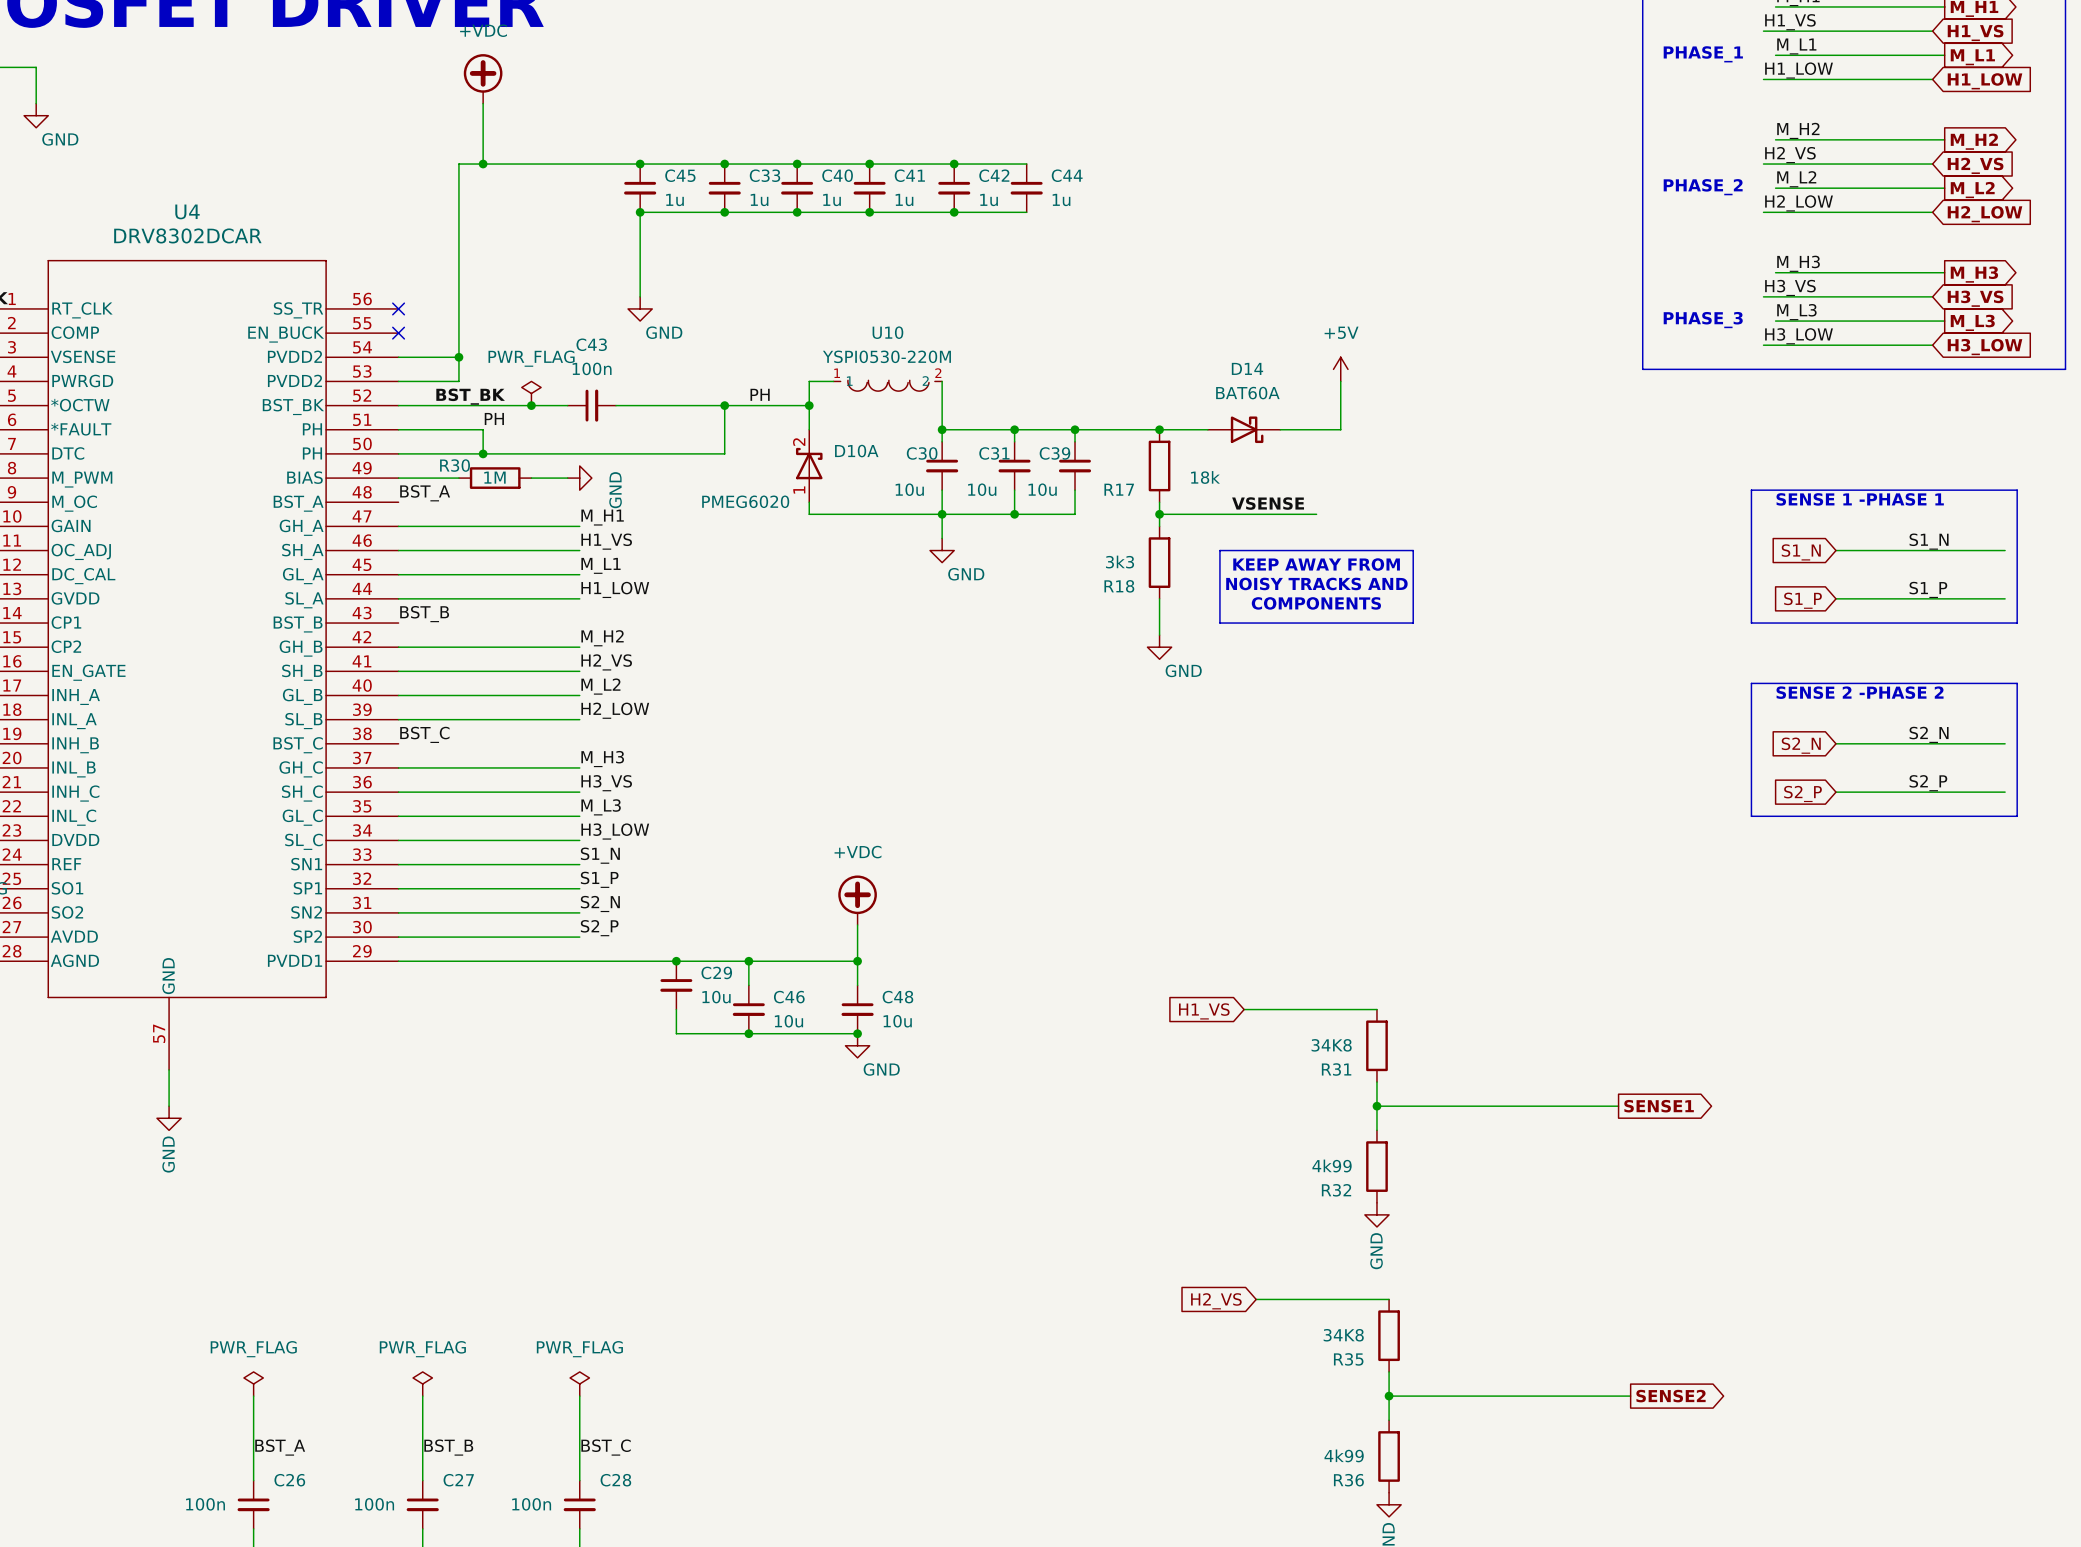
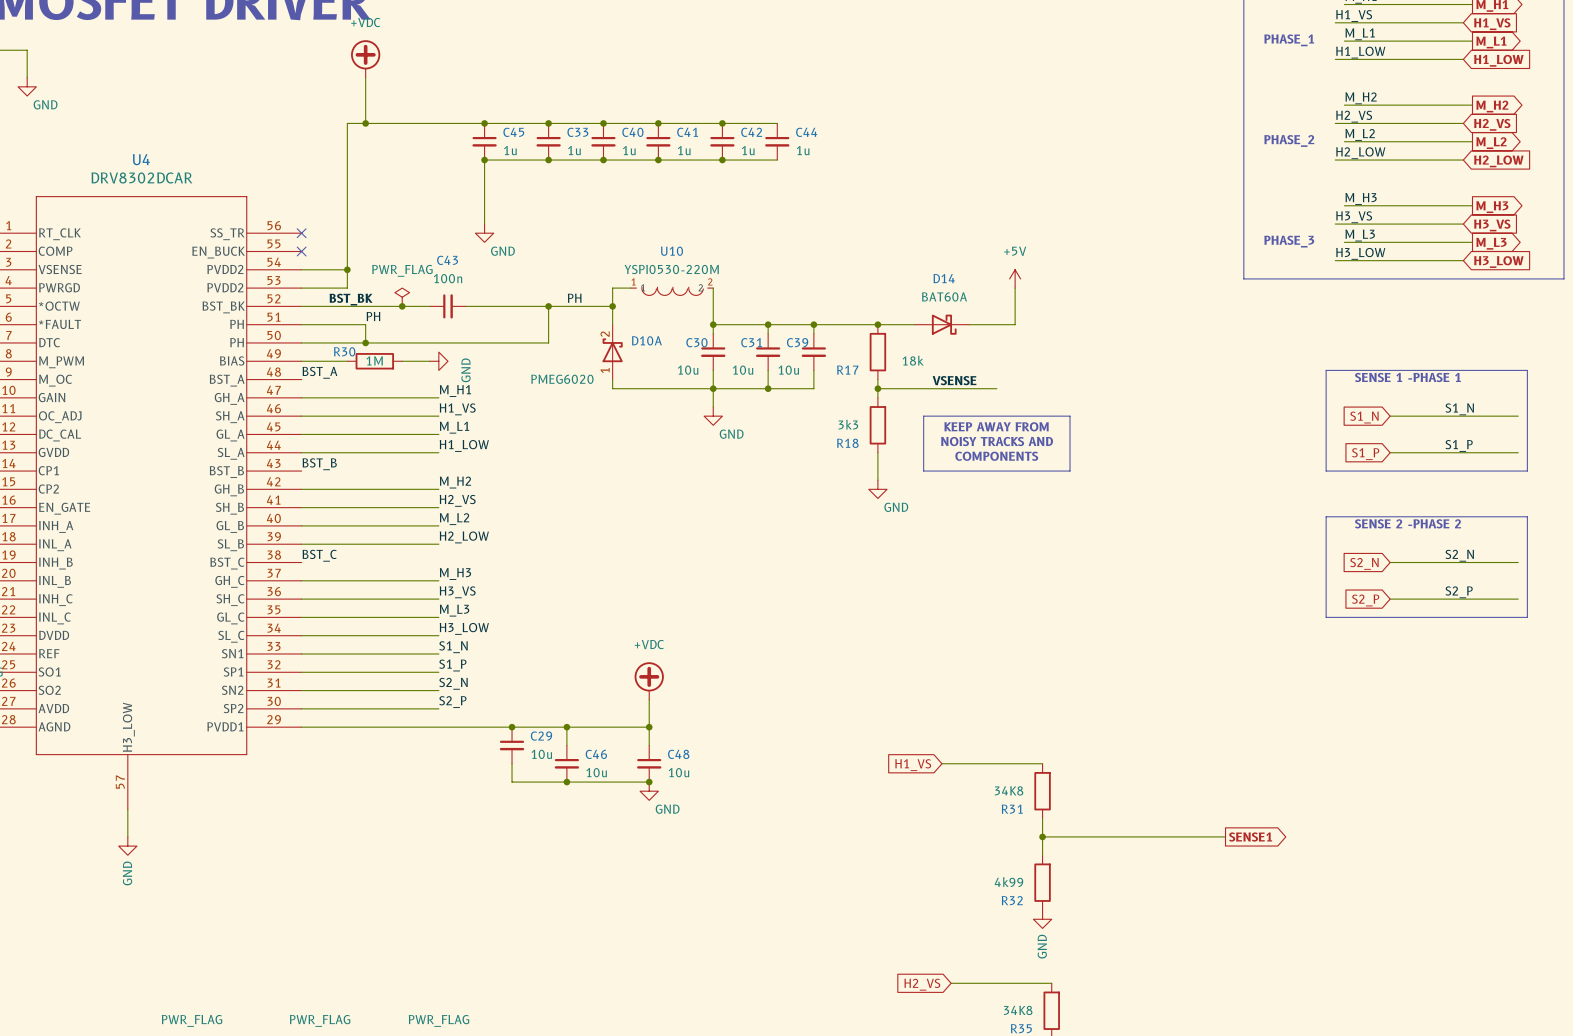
U4 pin name: GND (168, 976) -> H3_LOW (128, 727)

